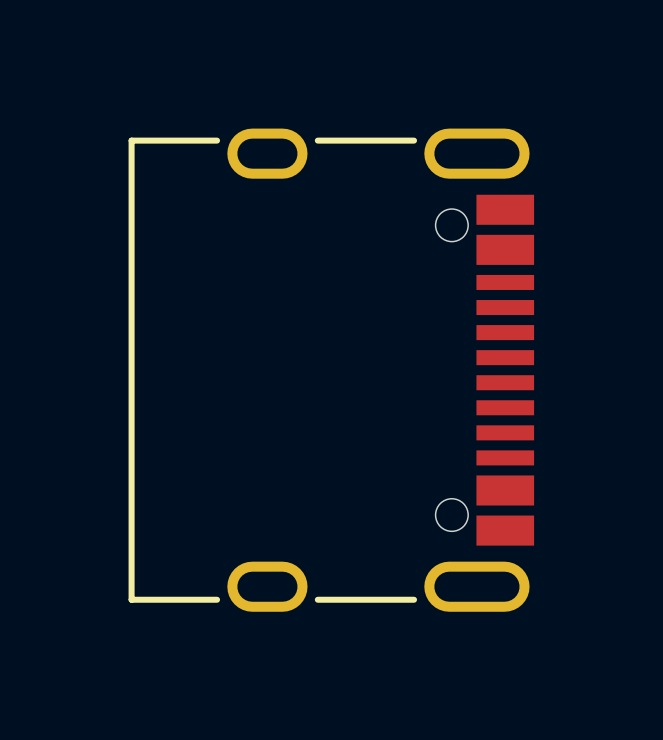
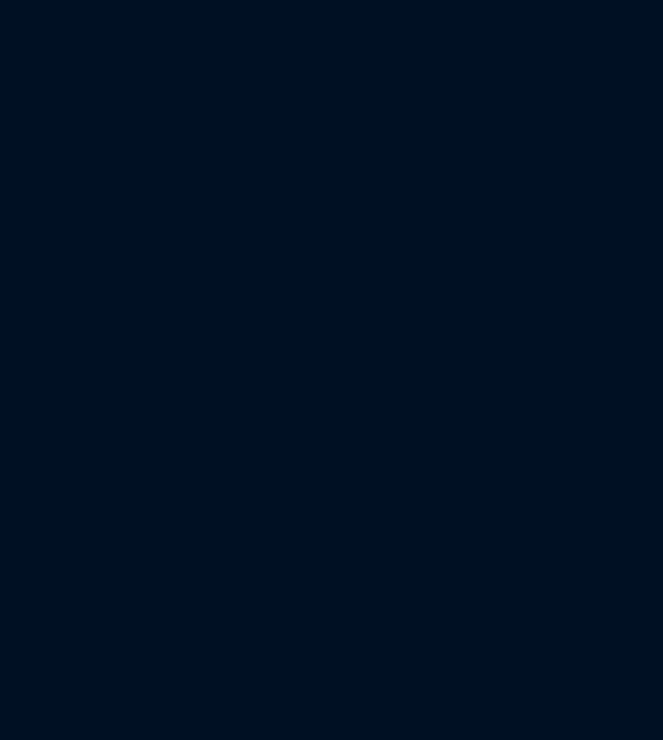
part: (331, 370) -> none

